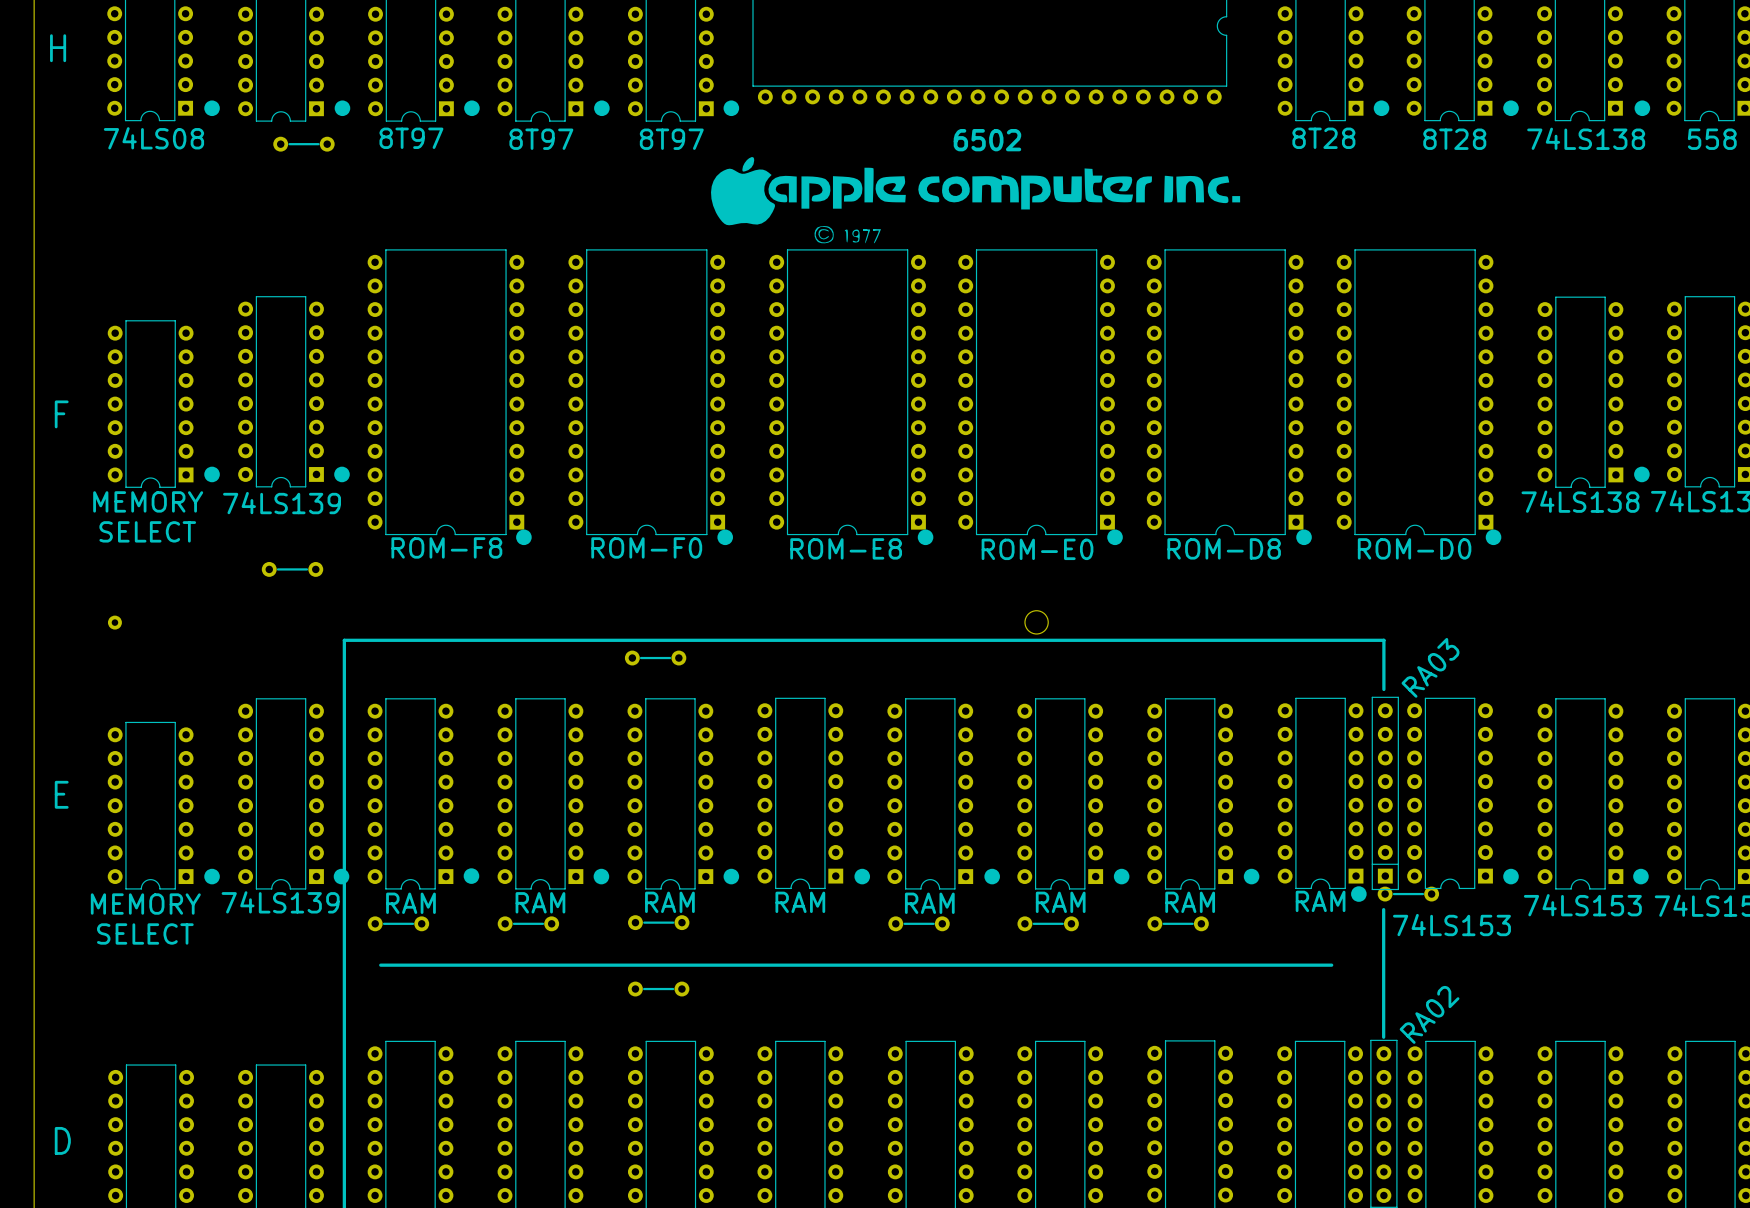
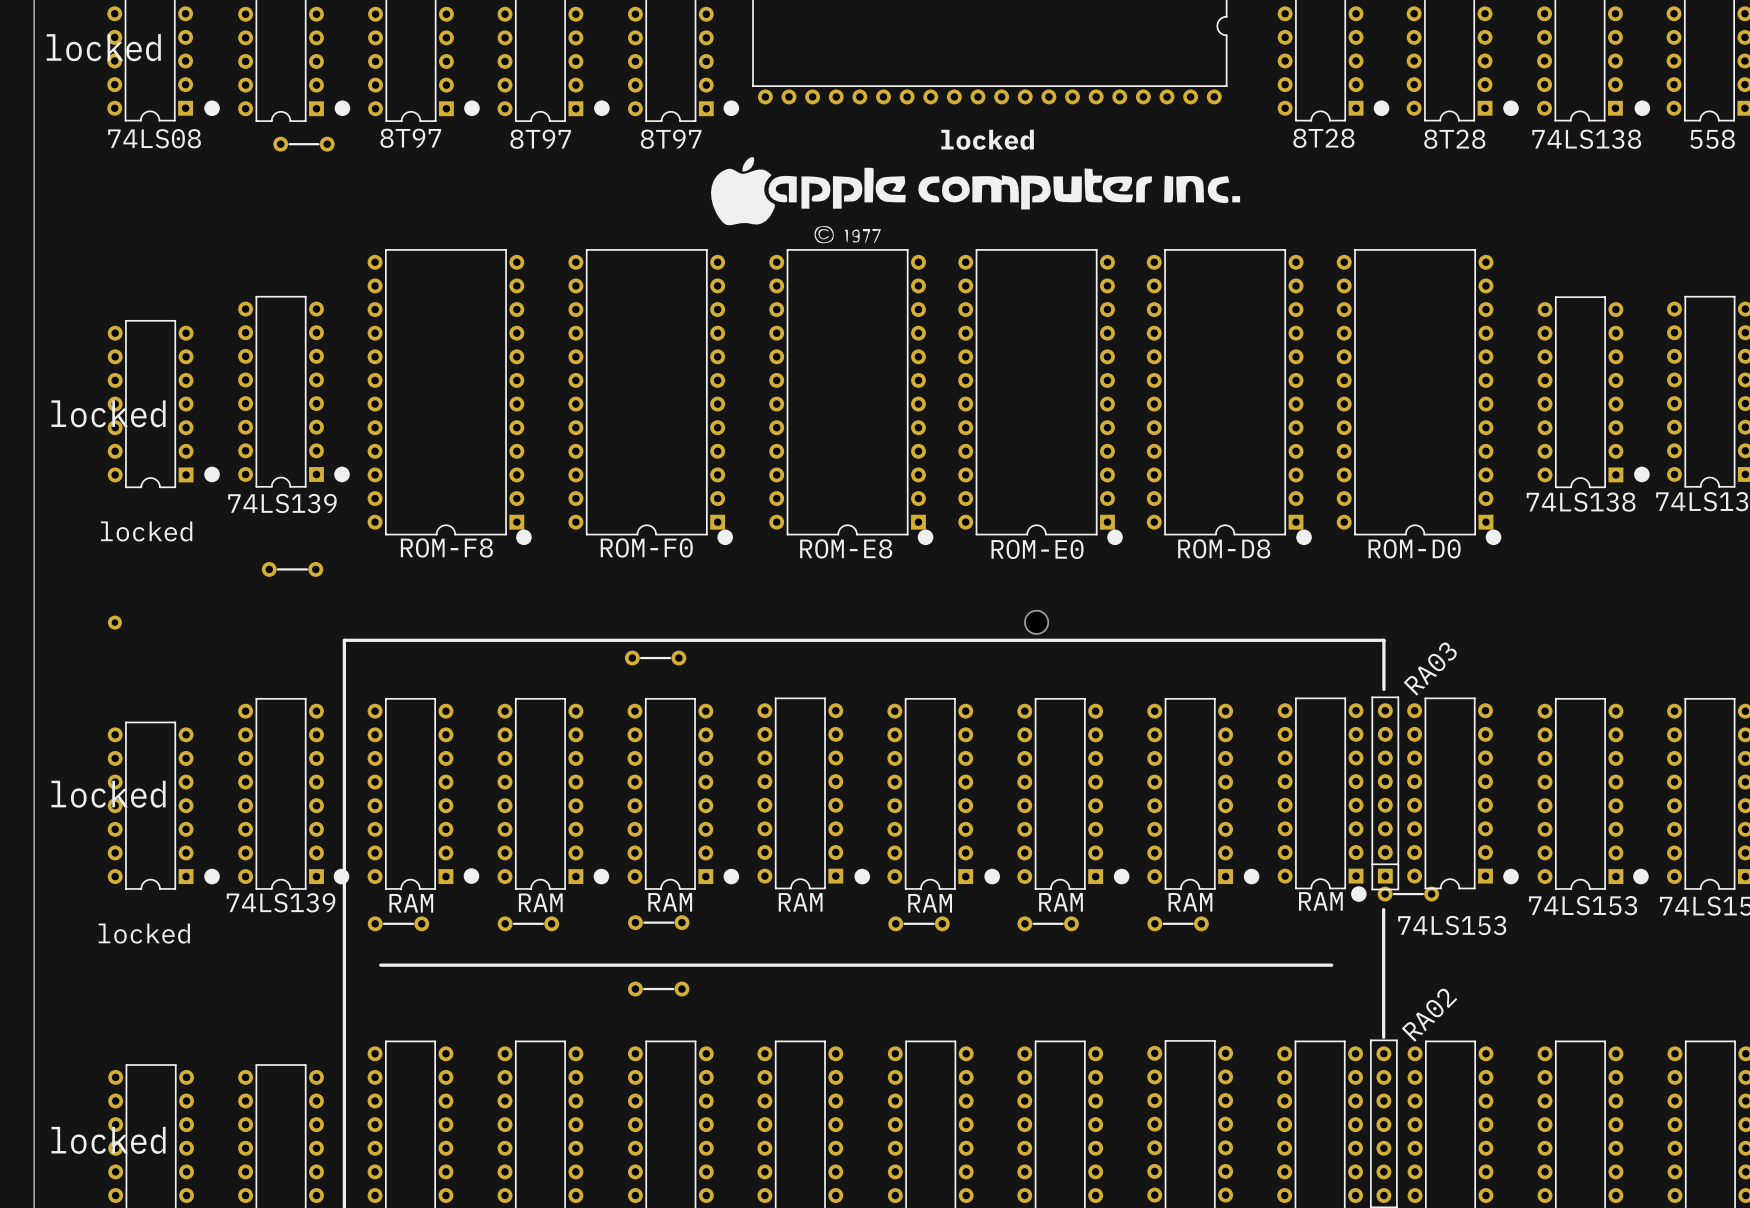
text: H (58, 48) -> locked (103, 47)
part value: 6502 (987, 140) -> locked (987, 139)
text: F (61, 414) -> locked (108, 413)
text: MEMORY (148, 501) -> none
text: SELECT (147, 531) -> locked (146, 531)
text: E (61, 794) -> locked (108, 794)
text: MEMORY (145, 904) -> none
text: SELECT (145, 933) -> locked (144, 933)
text: D (62, 1140) -> locked (108, 1140)

